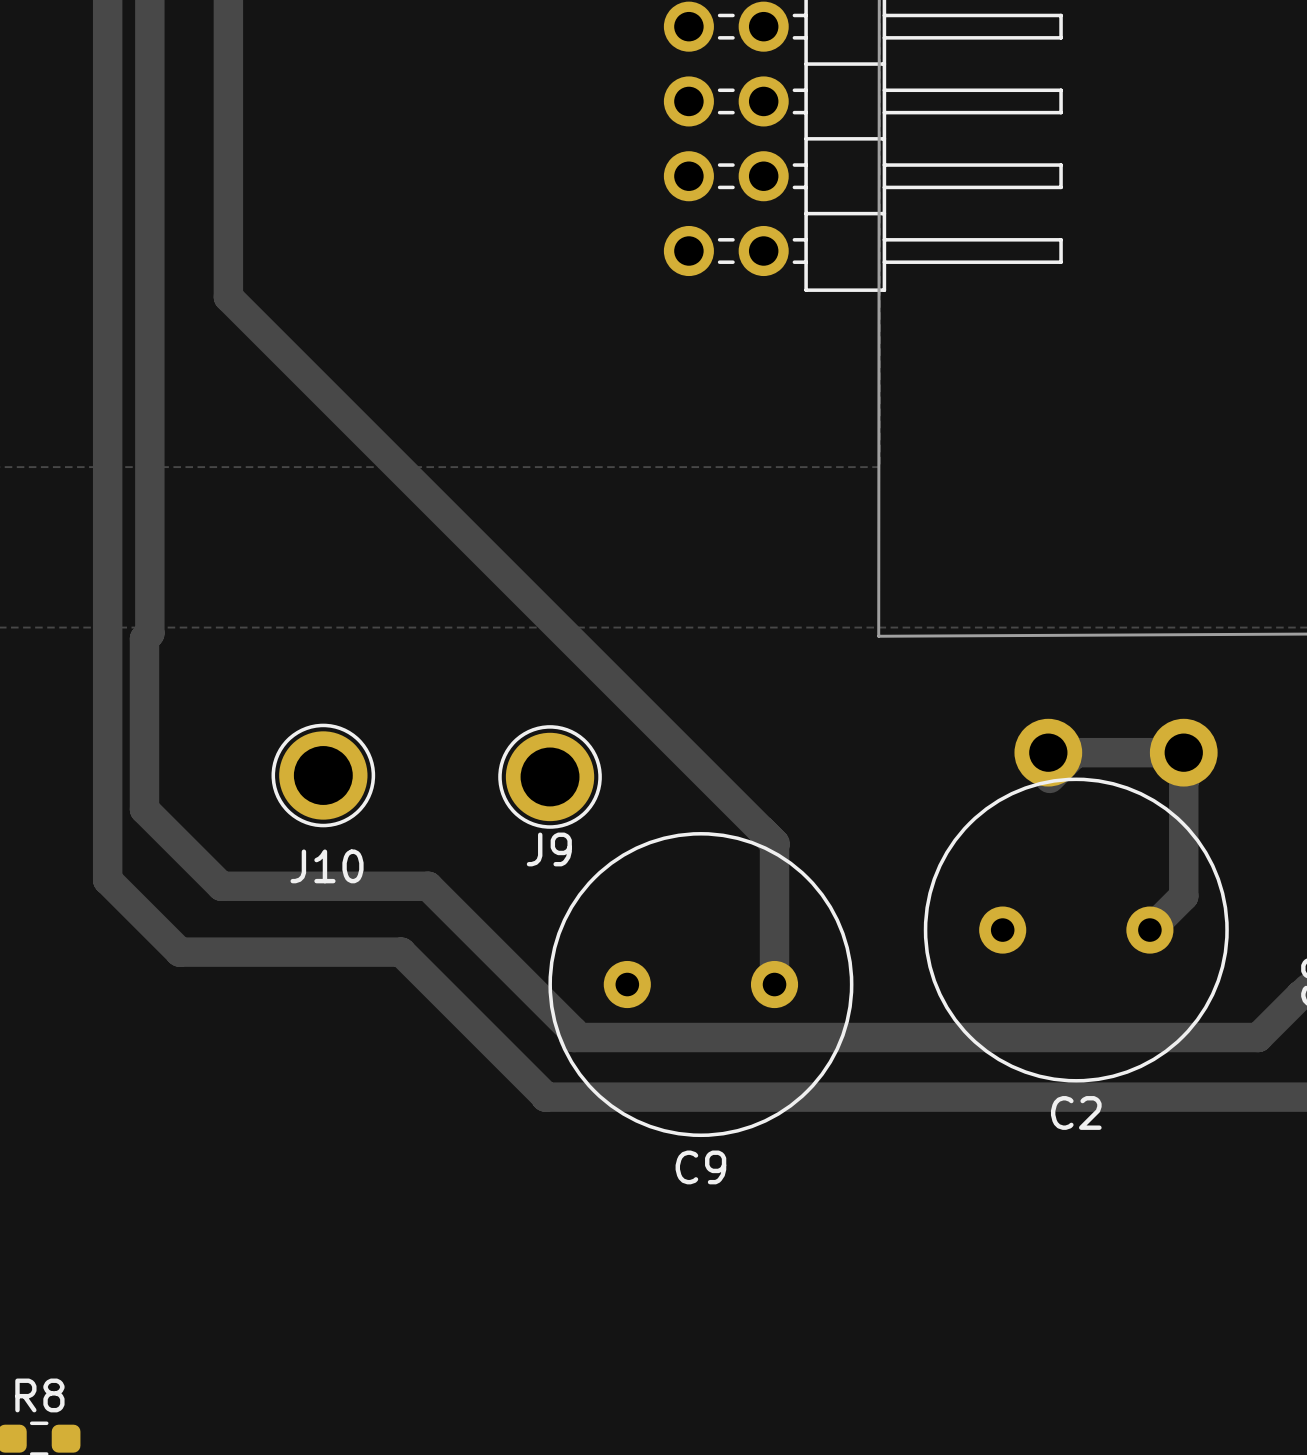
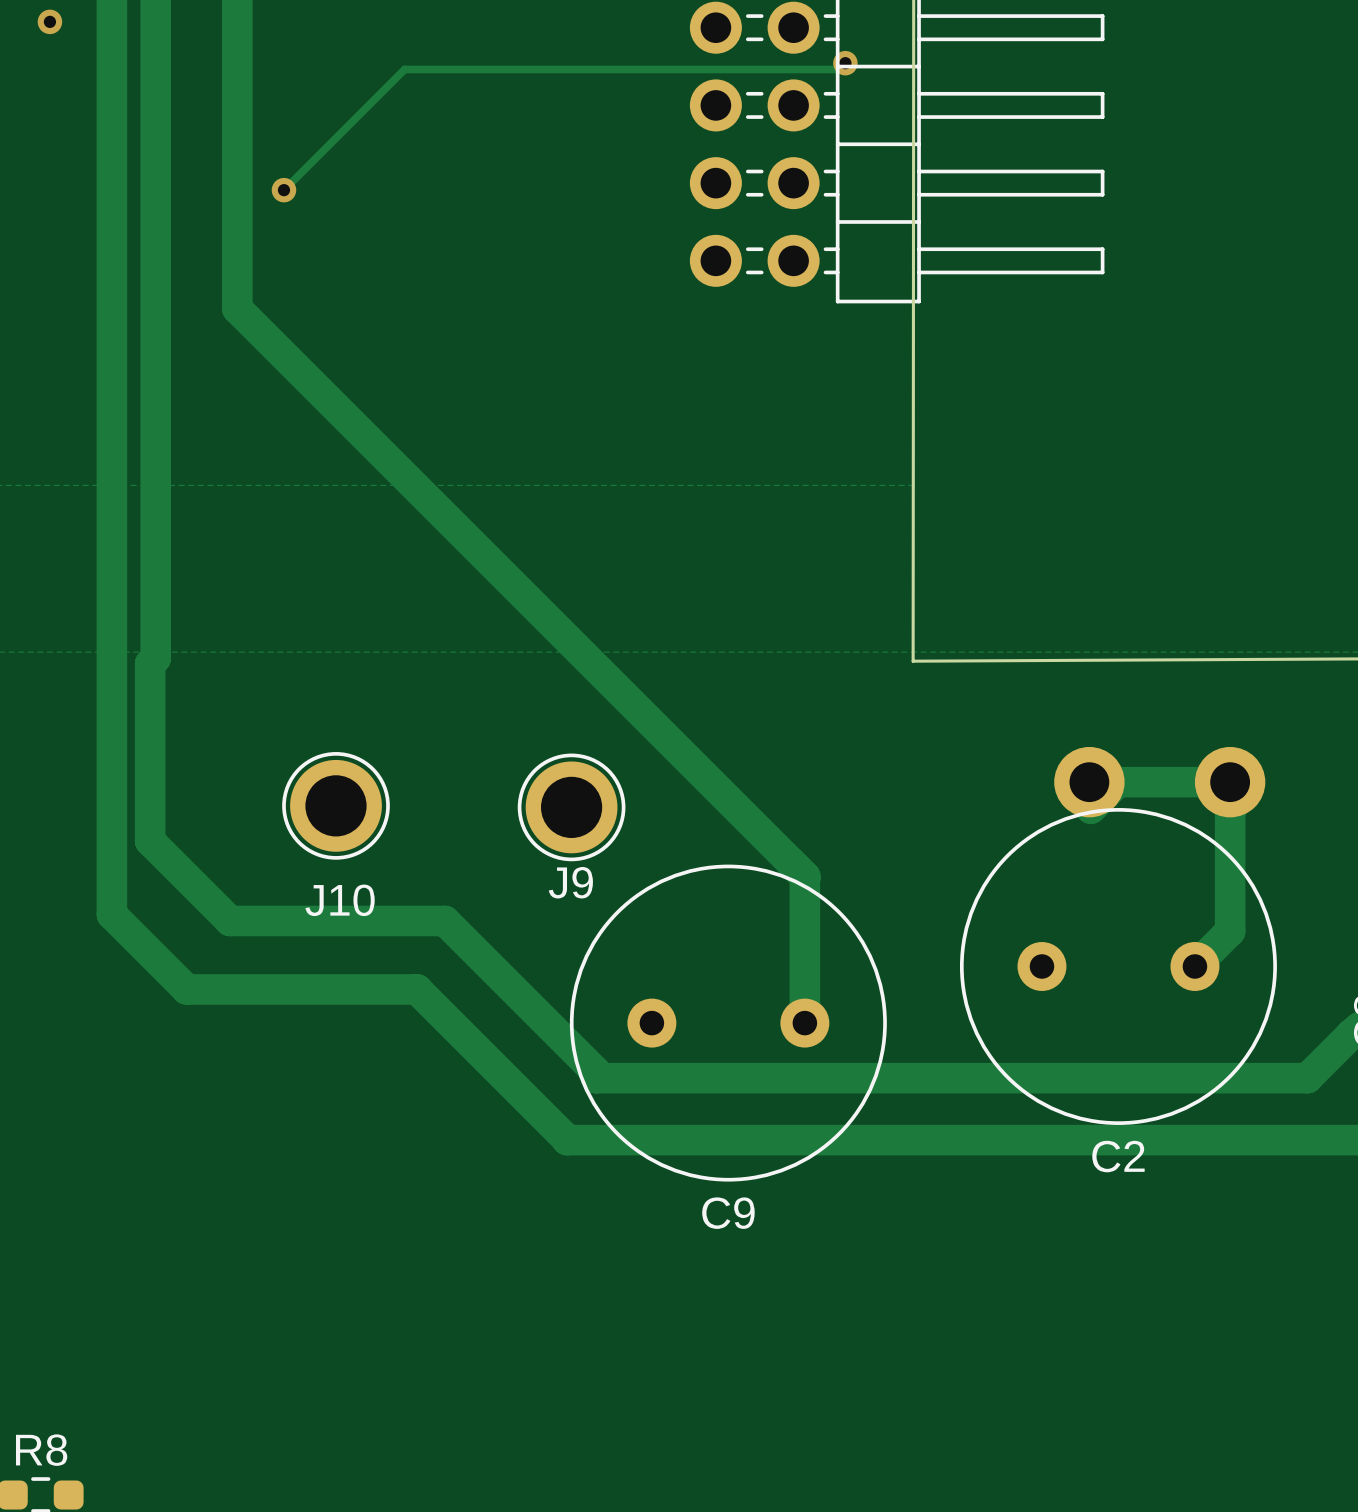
via: none -> (49, 21)
track: none -> (845, 63) (839, 69) (404, 69) (283, 190)
via: none -> (845, 63)
via: none -> (283, 190)

